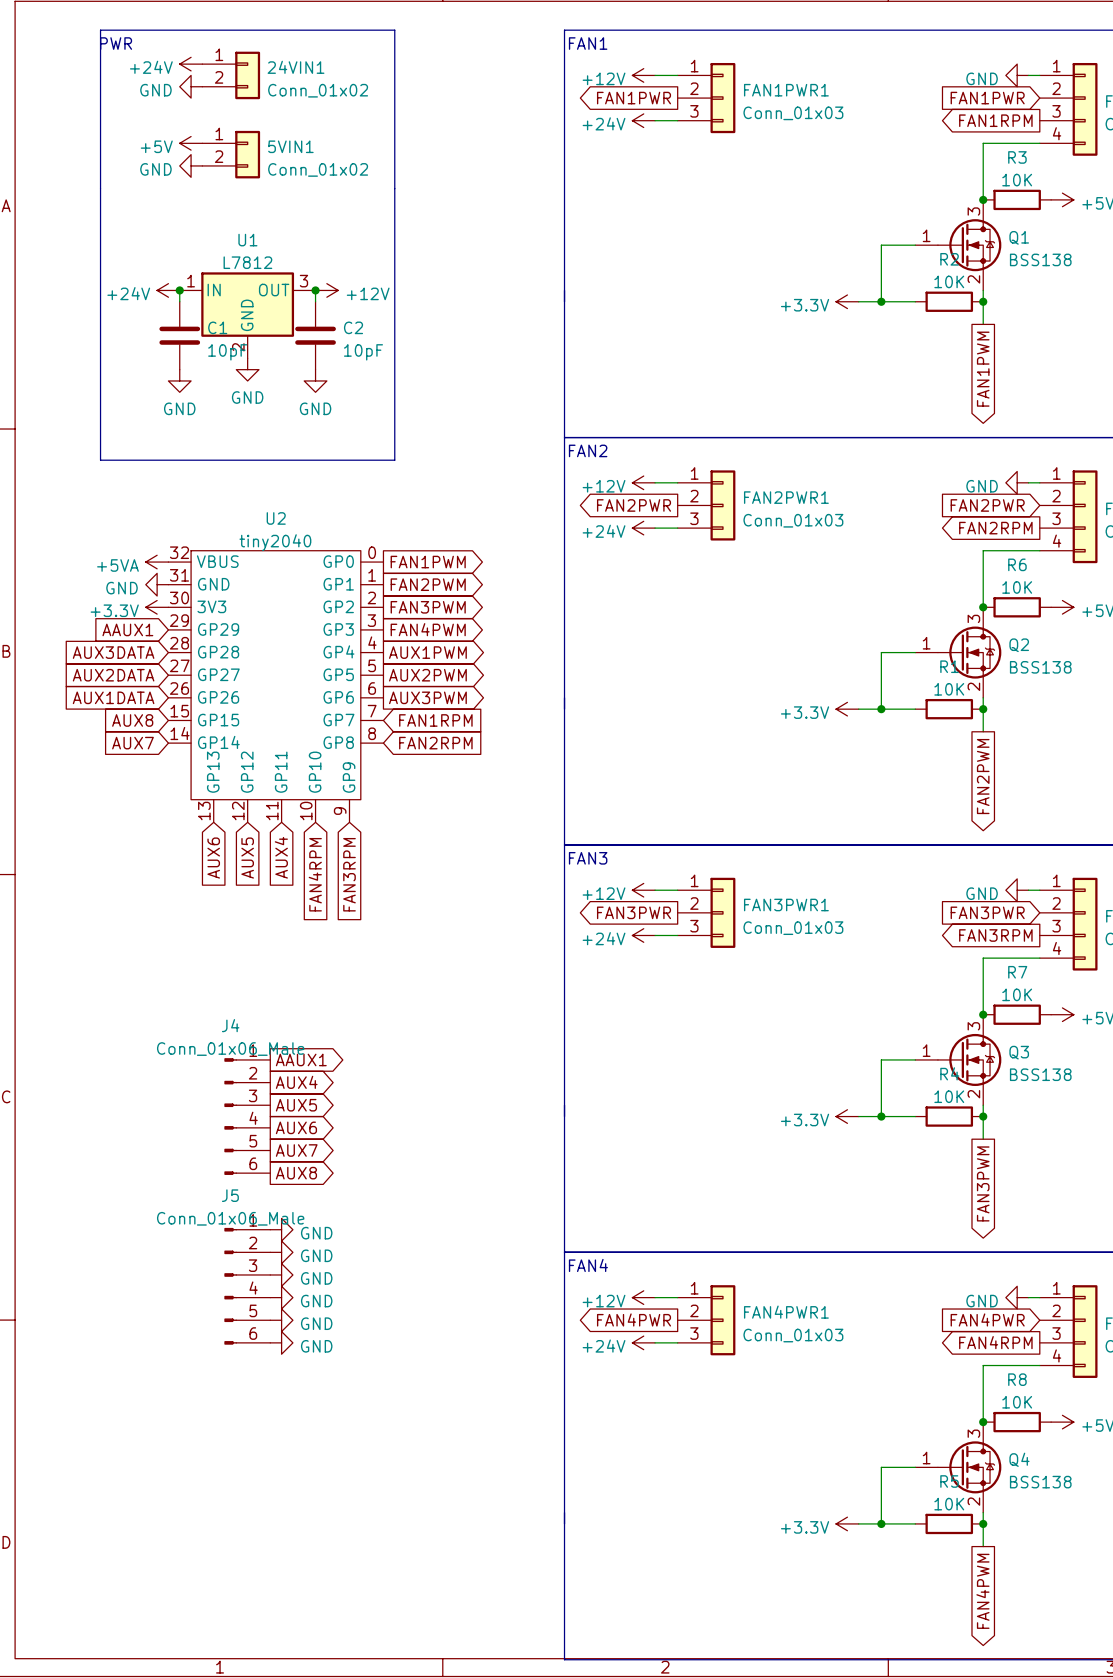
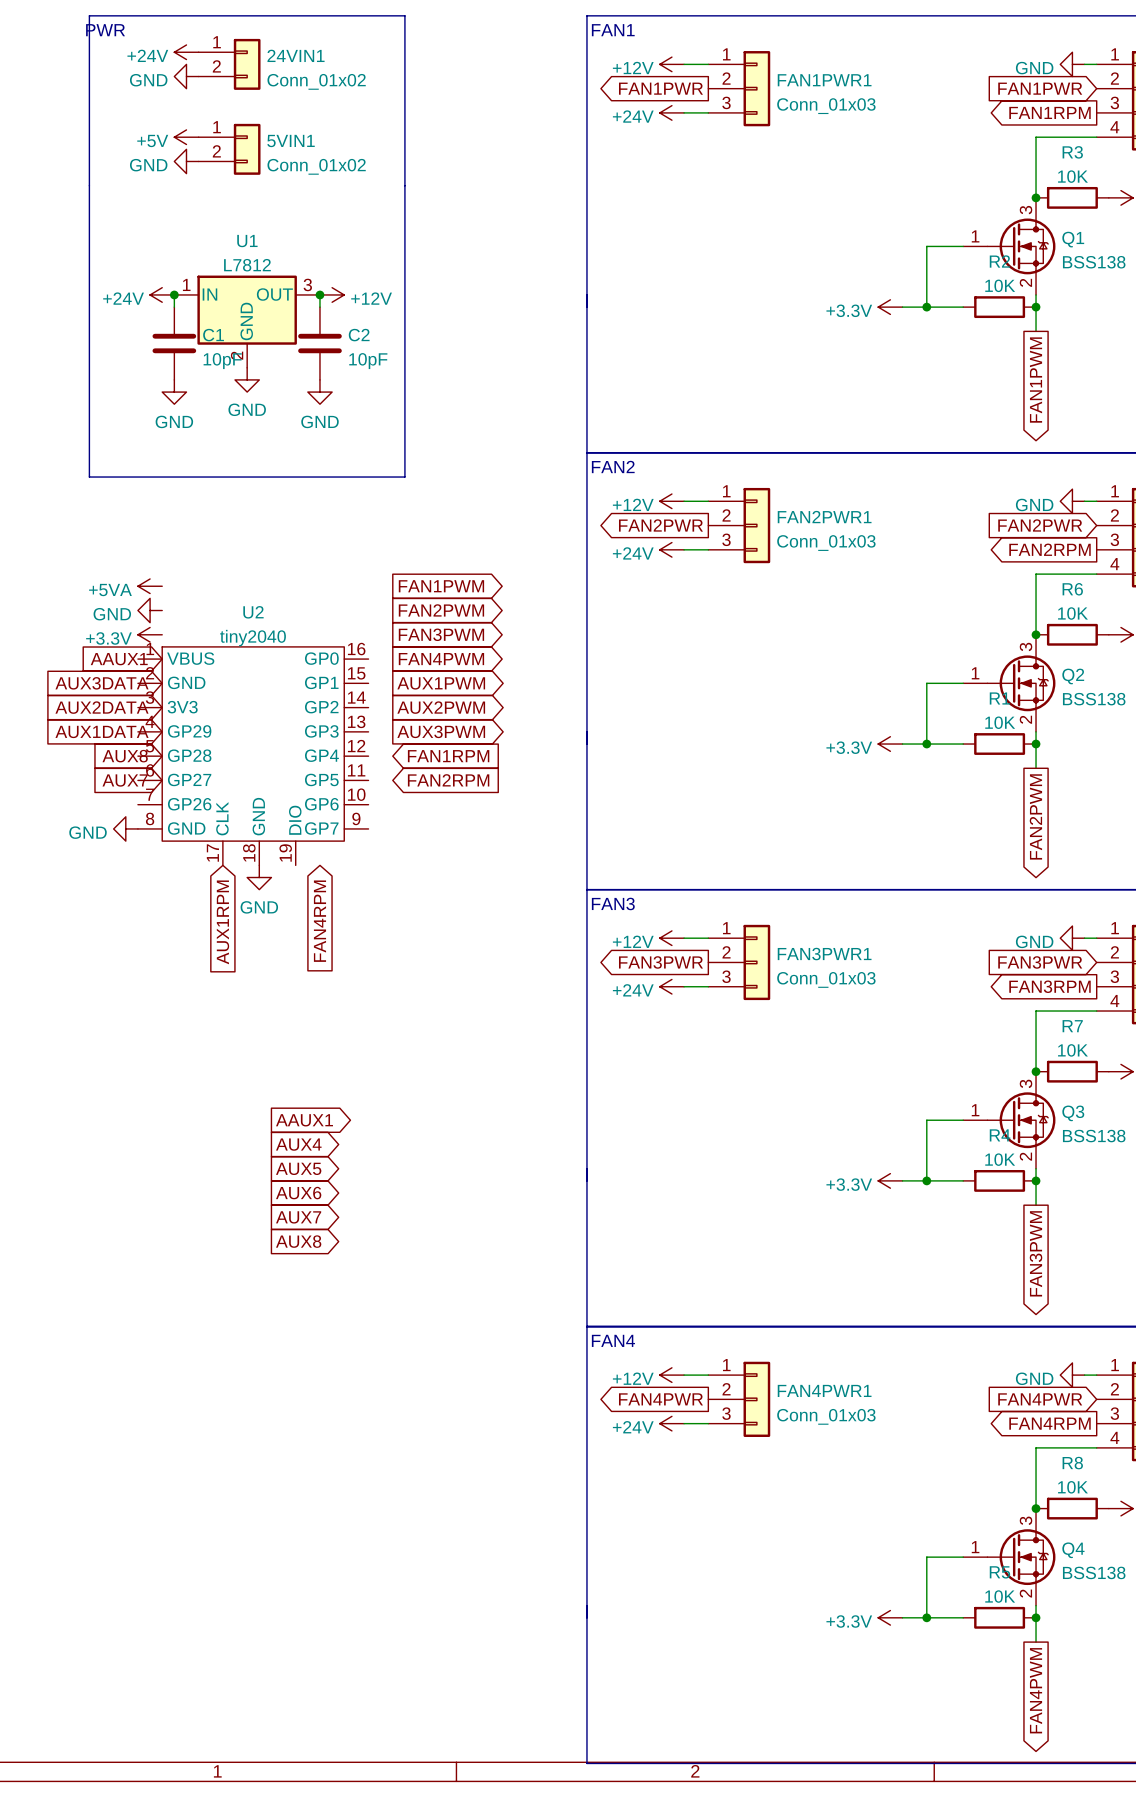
U2 name position: U2 (276, 518) -> U2 (253, 612)
U2 value position: tiny2040 (275, 542) -> tiny2040 (253, 638)
U2 symbol: [168, 550, 384, 823] -> [137, 646, 369, 866]
power symbol: none -> GND (125, 828)
power symbol: none -> GND (259, 877)
global label: AUX4 (281, 857) -> none
global label: AUX6 (213, 858) -> none
global label: AUX5 (247, 858) -> none
global label: FAN3RPM (349, 874) -> none
global label: none -> AUX1RPM (222, 922)
J4: Conn_01x06_Male (247, 1116) -> none
power symbol: GND (281, 1229) -> none
power symbol: GND (281, 1252) -> none
power symbol: GND (281, 1274) -> none
J5: Conn_01x06_Male (247, 1286) -> none
power symbol: GND (281, 1297) -> none
power symbol: GND (281, 1320) -> none
power symbol: GND (281, 1342) -> none

